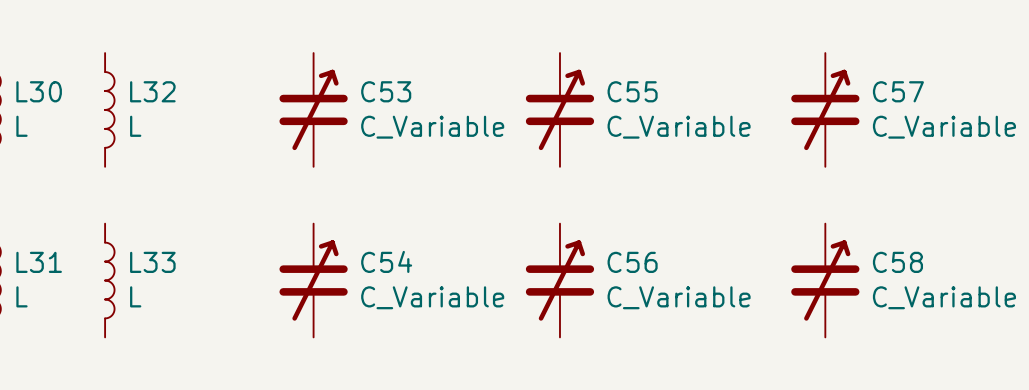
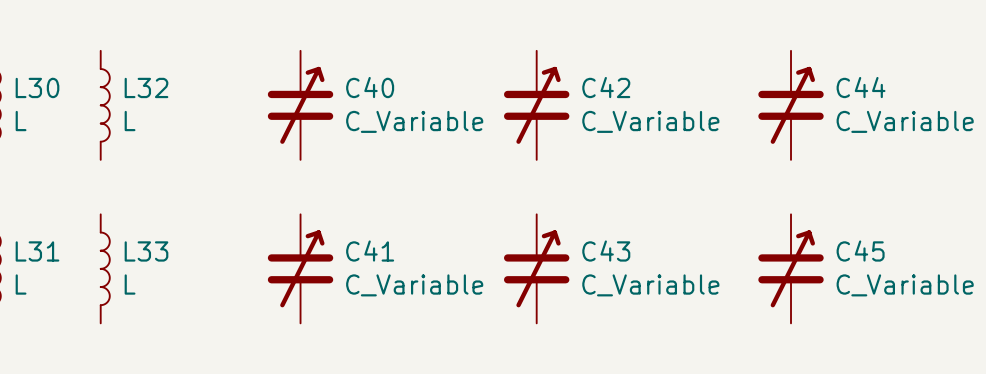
C53 name: C53 (386, 91) -> C40 (370, 87)
C55 name: C55 (632, 91) -> C42 (606, 87)
C57 name: C57 (898, 91) -> C44 (861, 87)
C54 name: C54 (386, 261) -> C41 (370, 251)
C56 name: C56 (632, 262) -> C43 (606, 251)
C58 name: C58 (897, 262) -> C45 (860, 251)

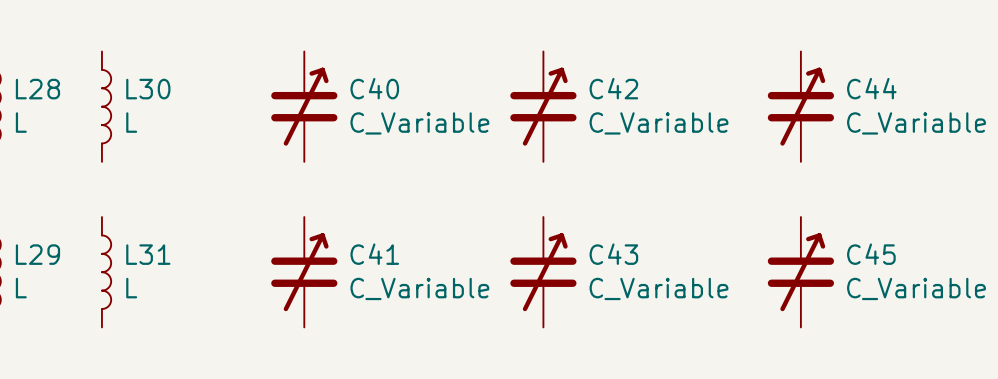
L30 name: L30 (37, 87) -> L28 (37, 89)
L32 name: L32 (146, 87) -> L30 (148, 89)
L31 name: L31 (37, 251) -> L29 (37, 254)
L33 name: L33 (146, 251) -> L31 (148, 254)

